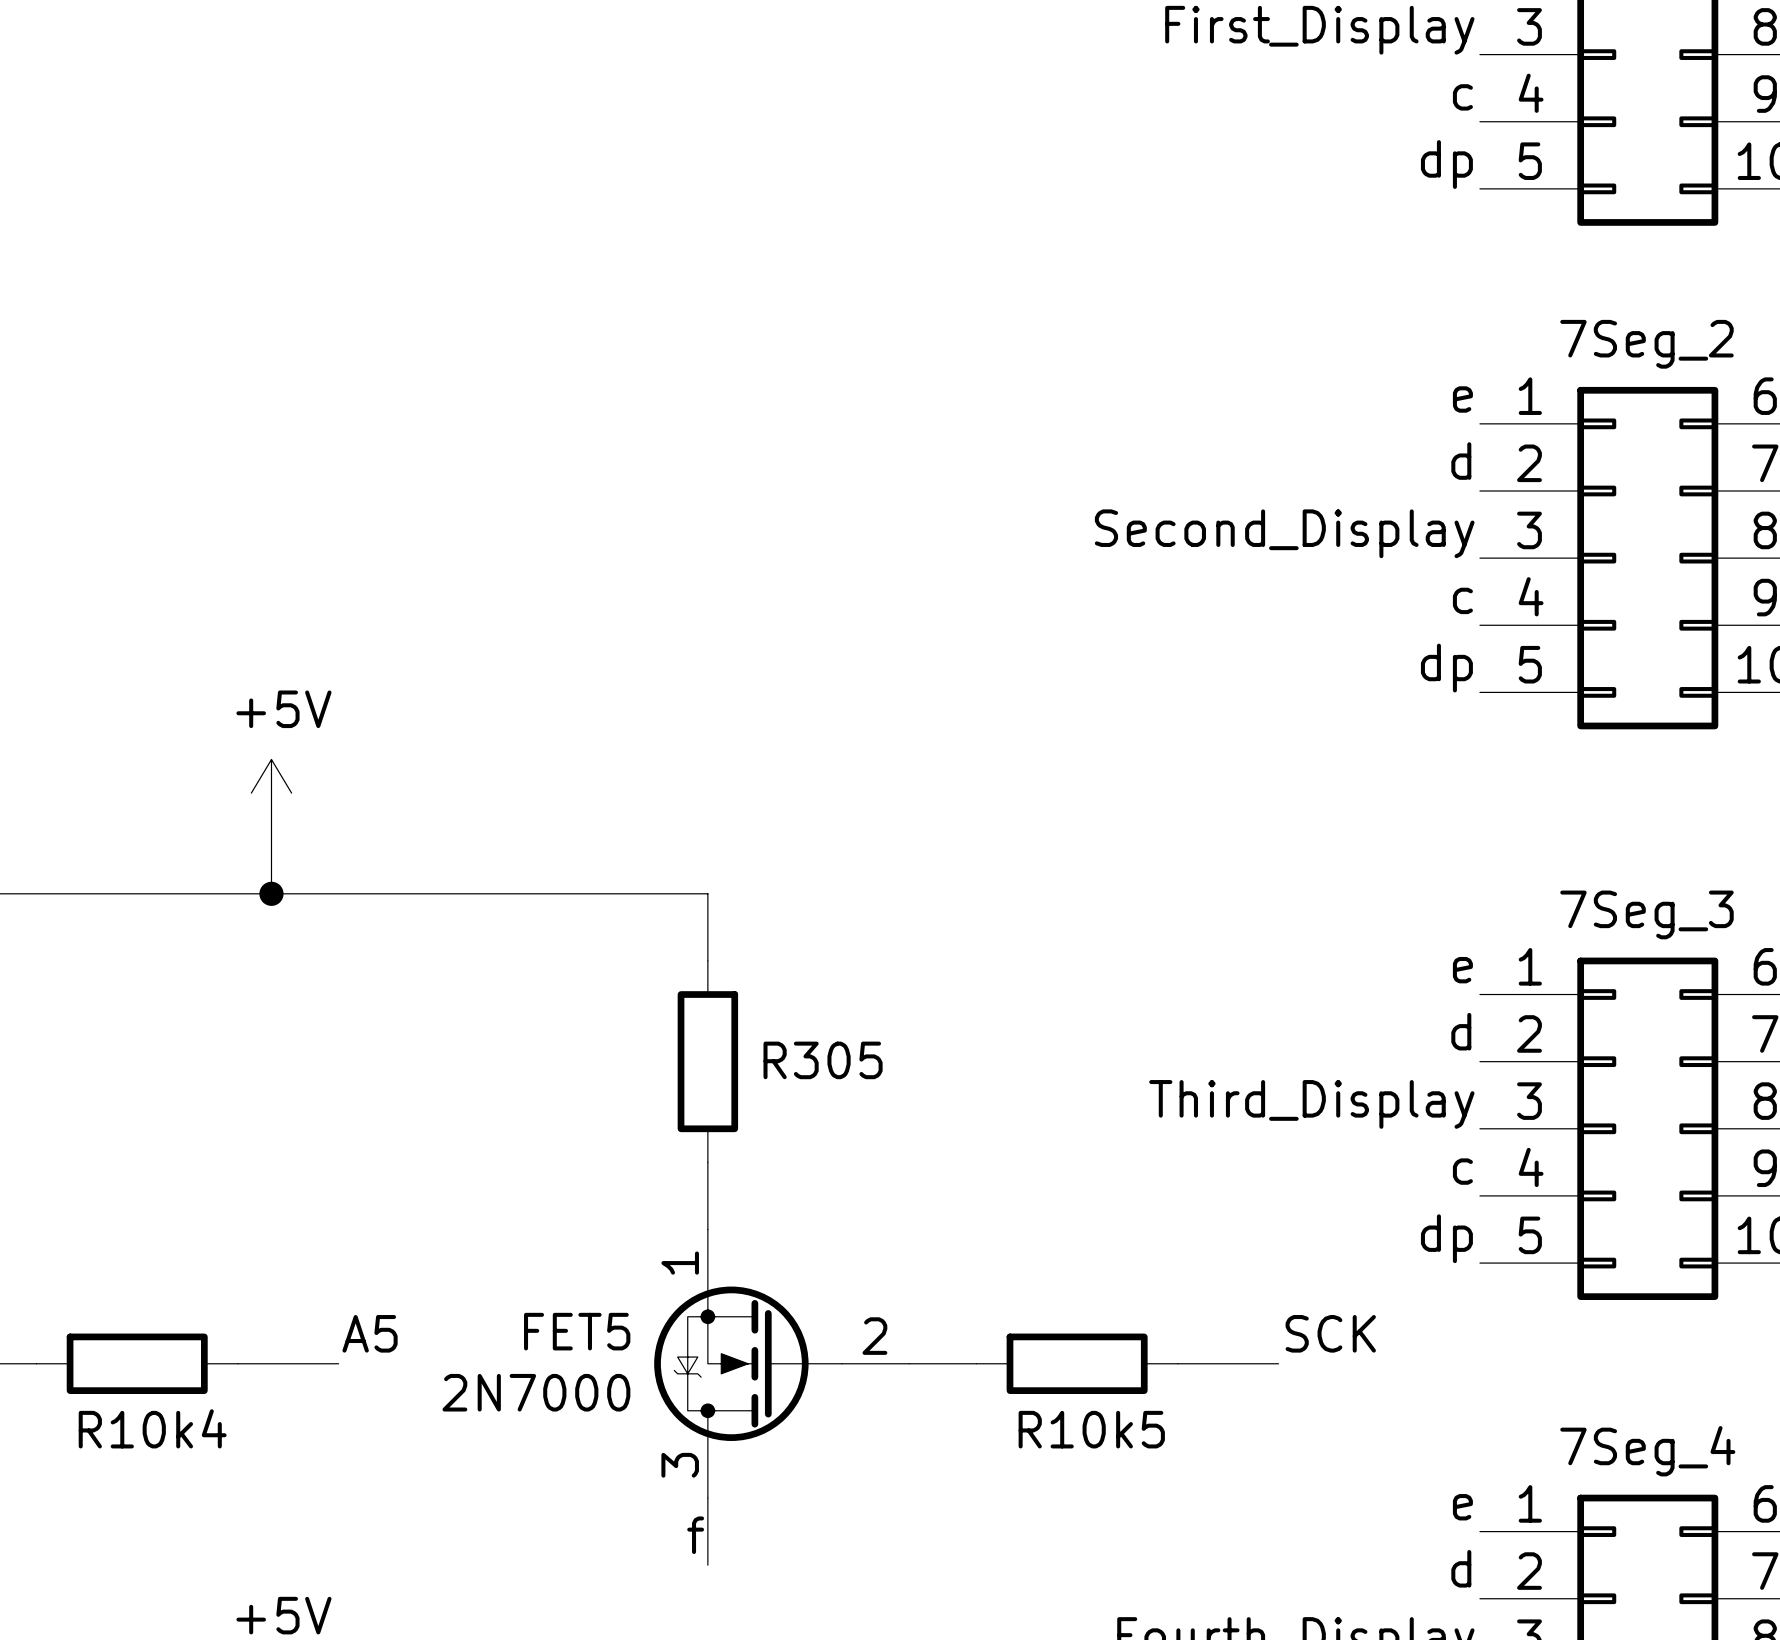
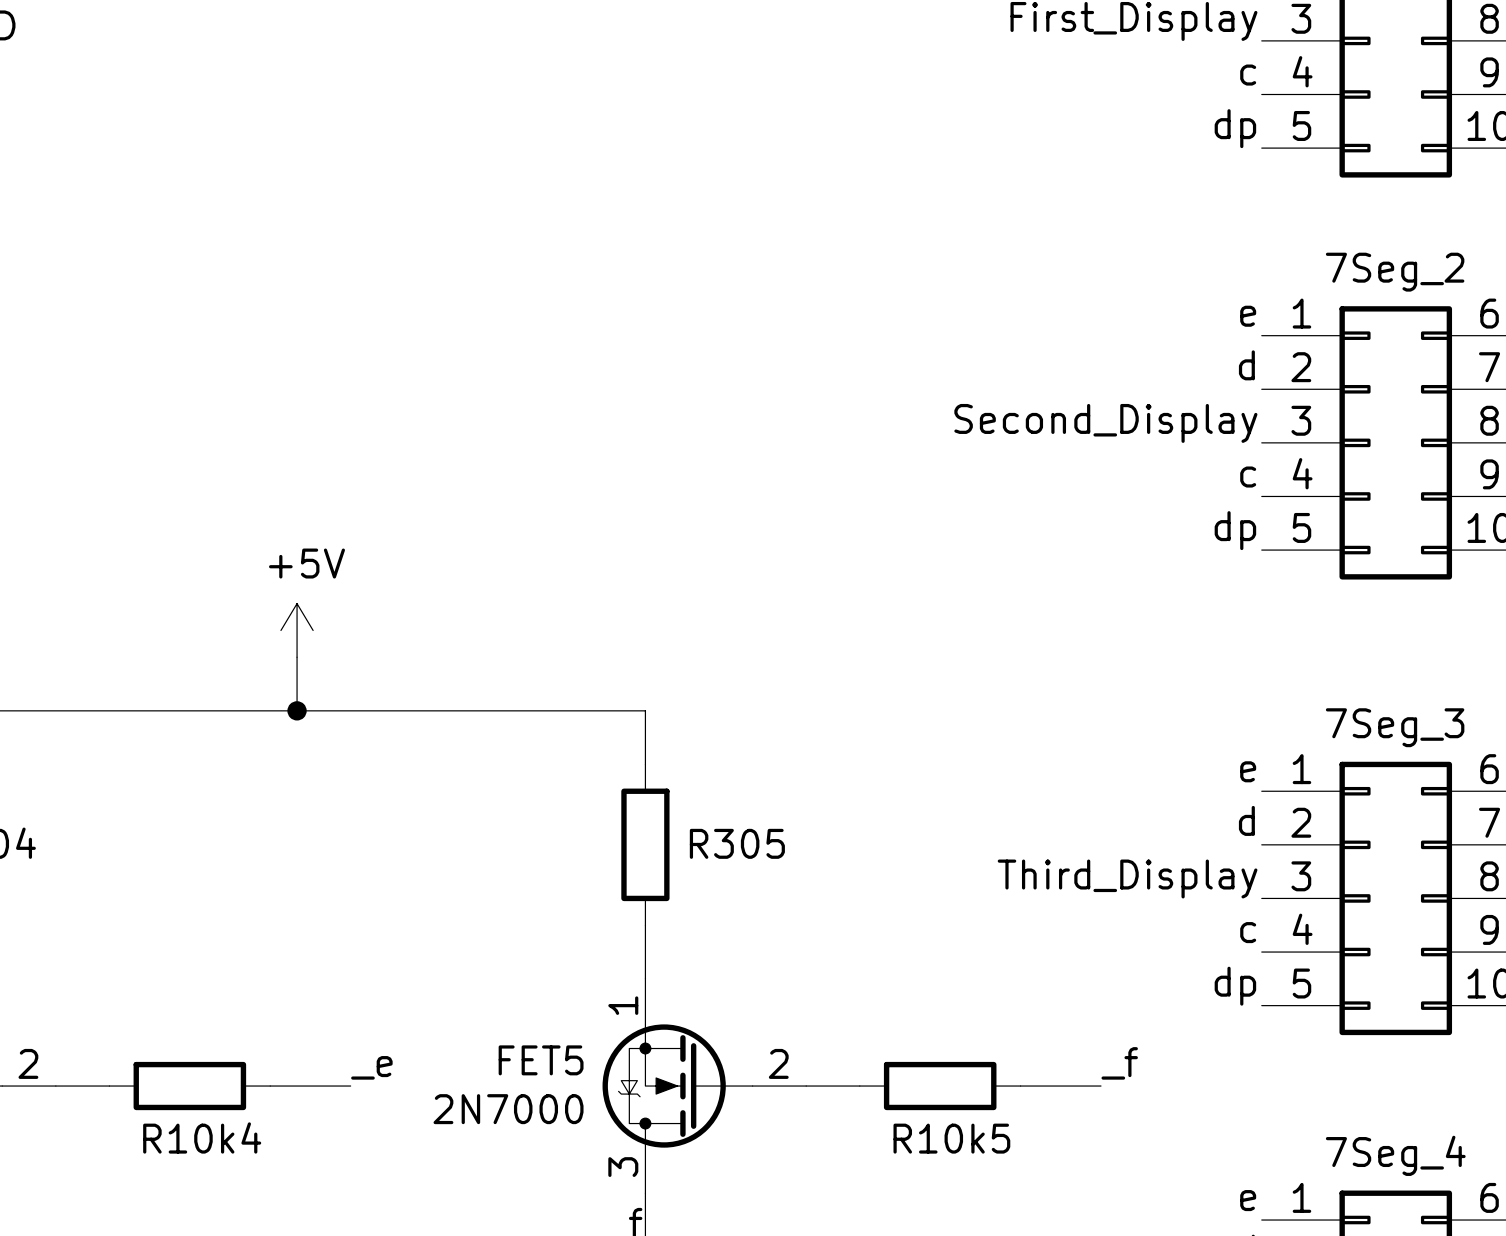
label: A5 (370, 1333) -> _e (371, 1067)
label: SCK (1330, 1333) -> _f (1119, 1063)

